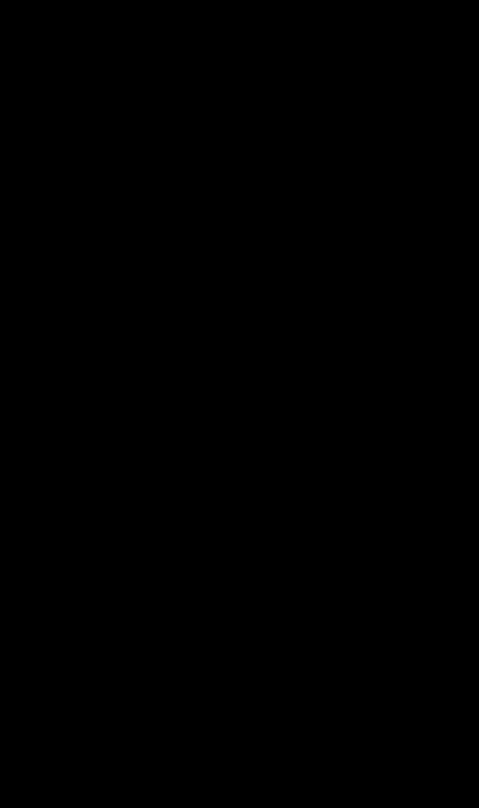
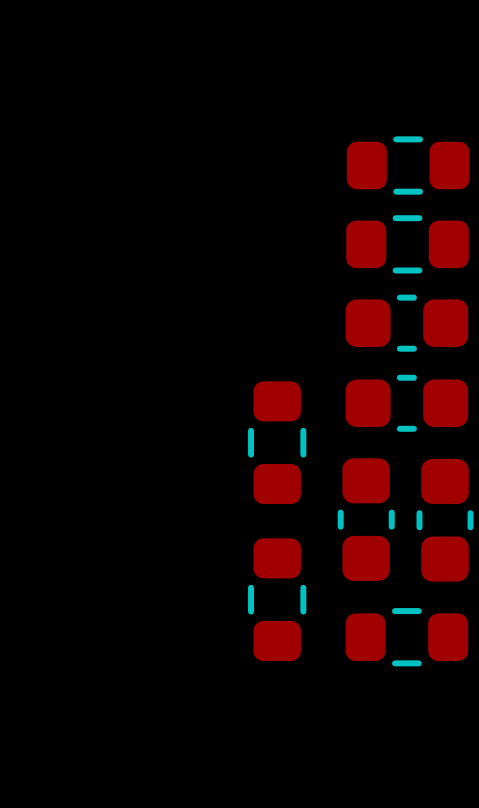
part: none -> (408, 165)
part: none -> (407, 244)
part: none -> (406, 323)
part: none -> (406, 403)
part: none -> (277, 442)
part: none -> (366, 519)
part: none -> (445, 520)
part: none -> (277, 599)
part: none -> (406, 637)

